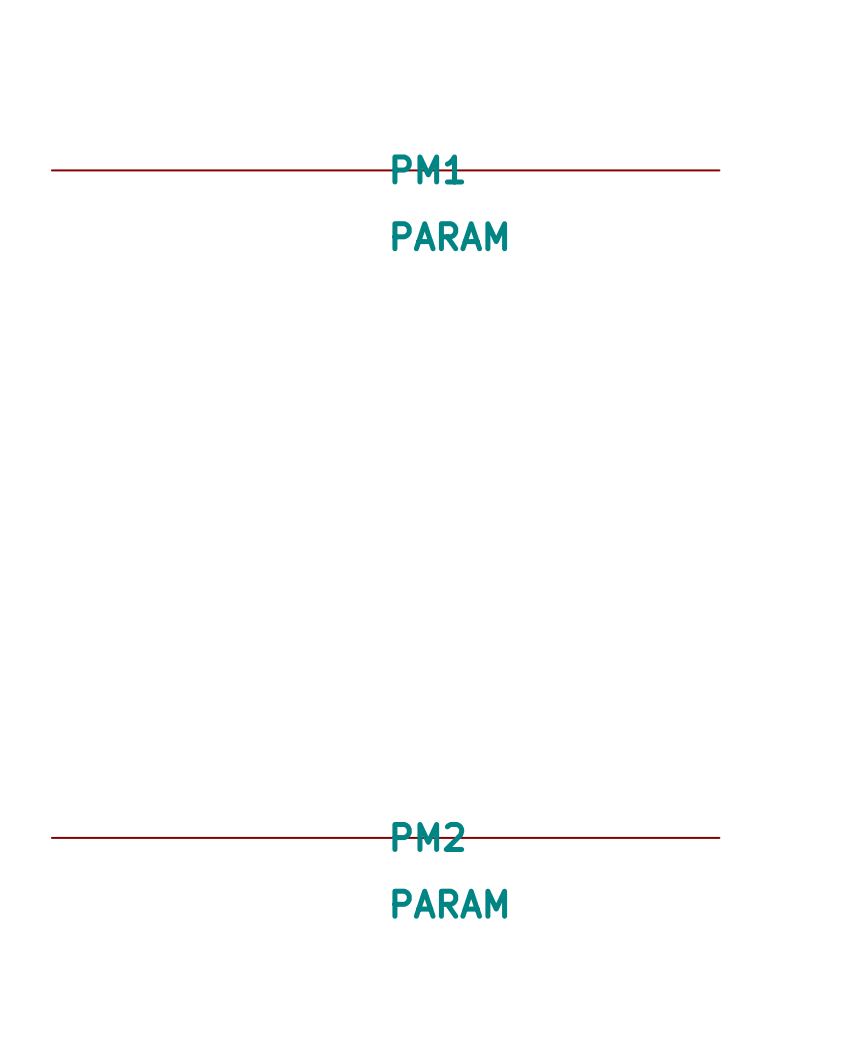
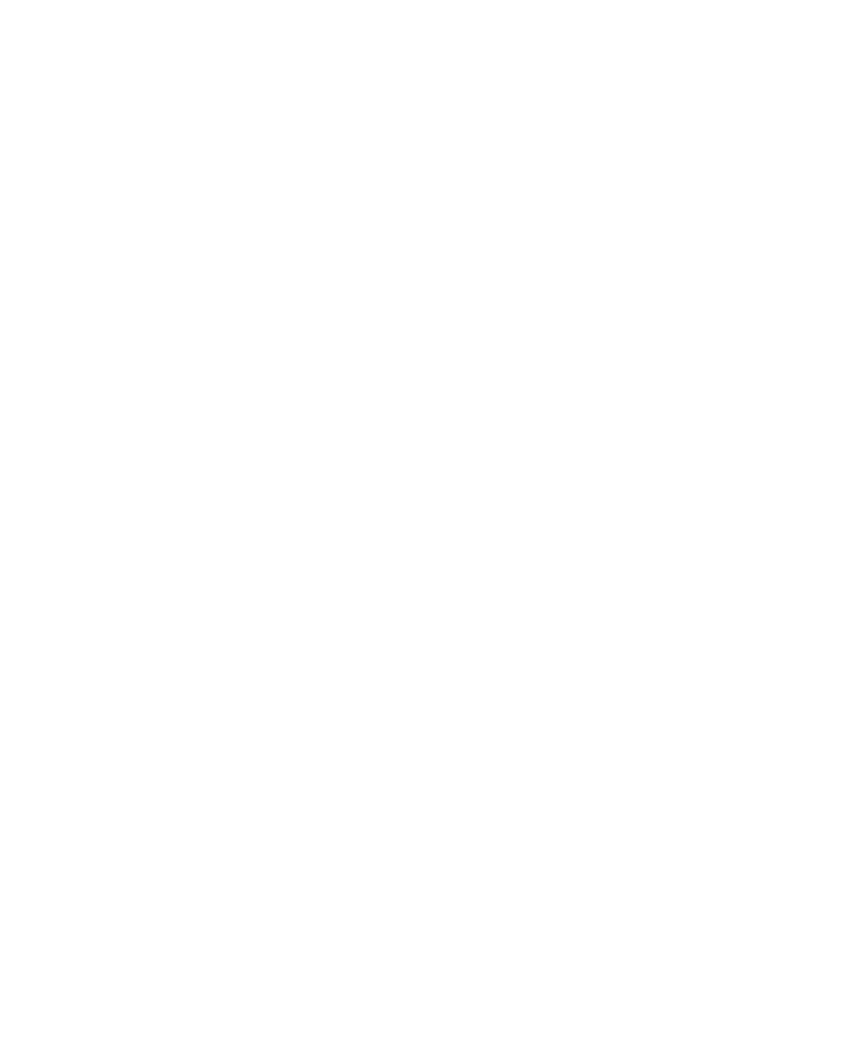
PM1: PARAM (385, 170) -> none
PM2: PARAM (385, 837) -> none

